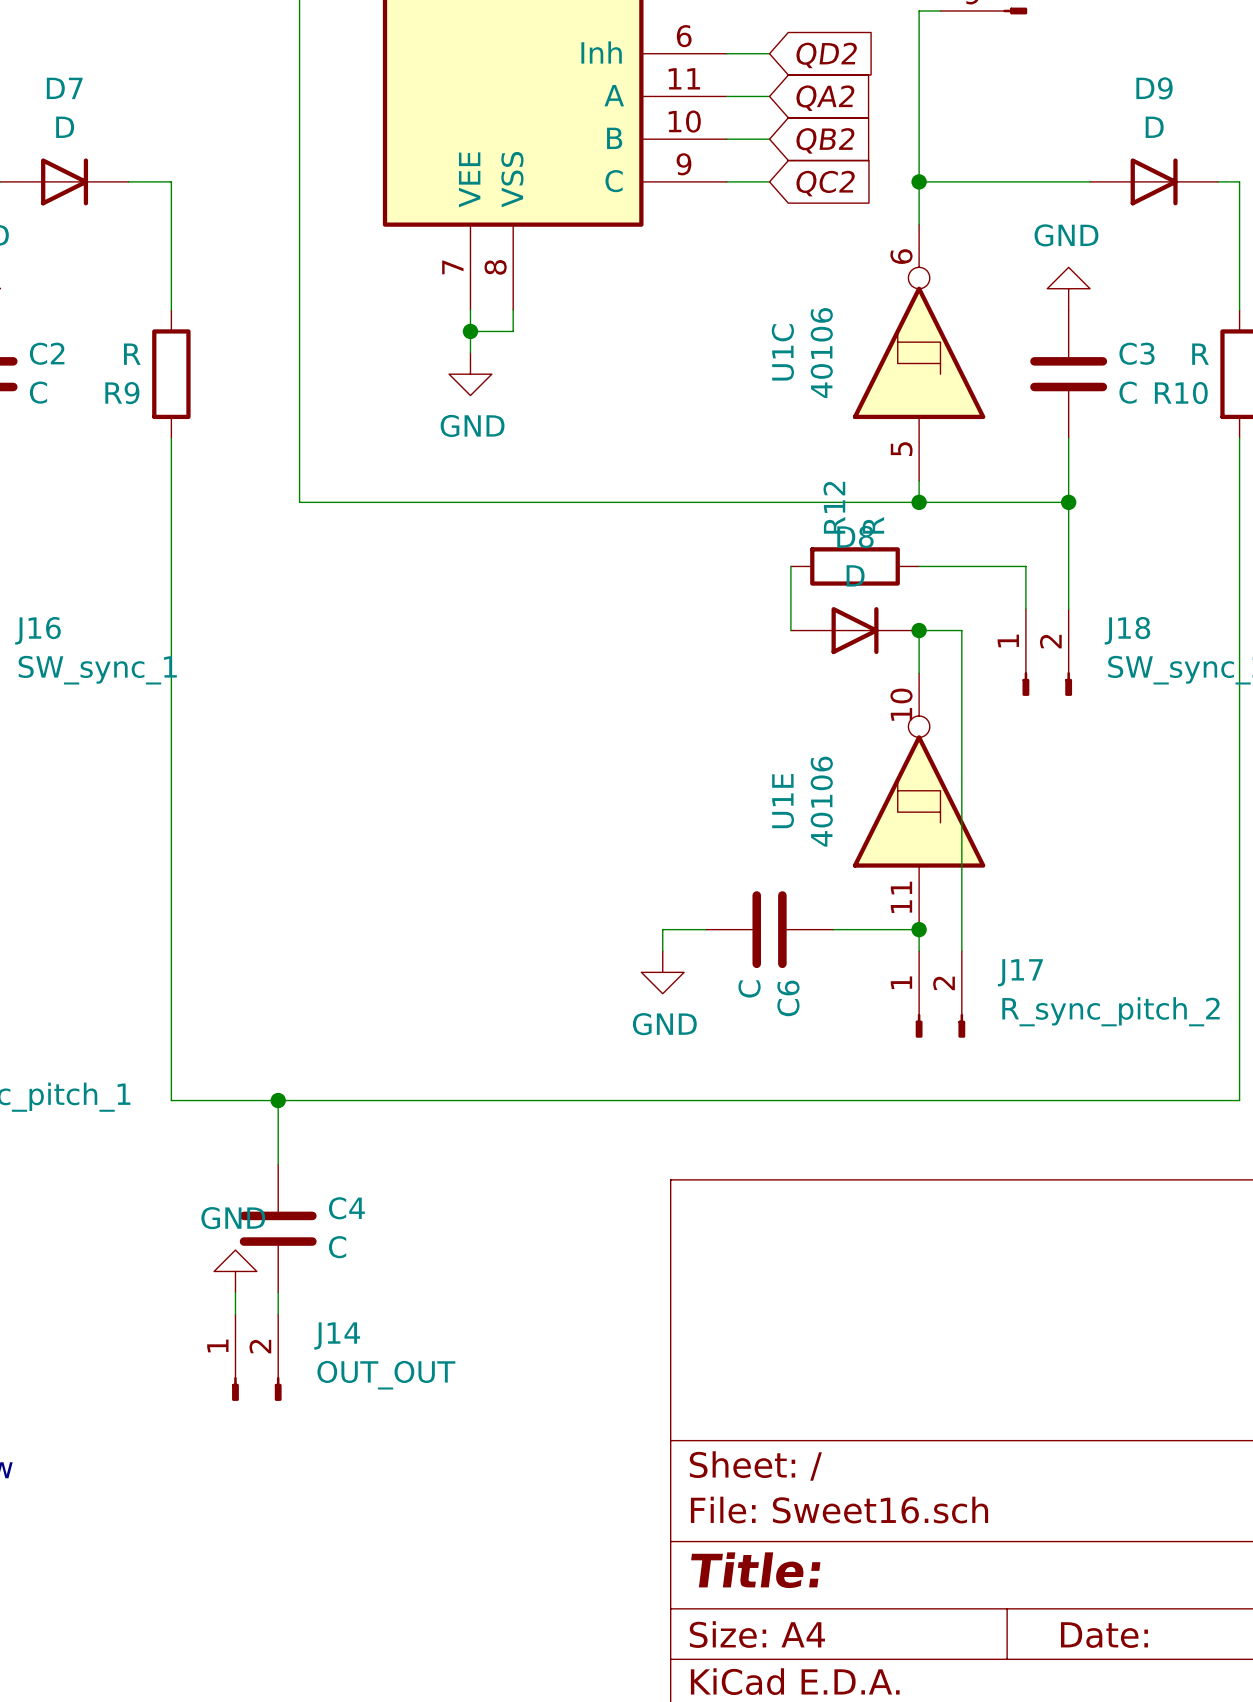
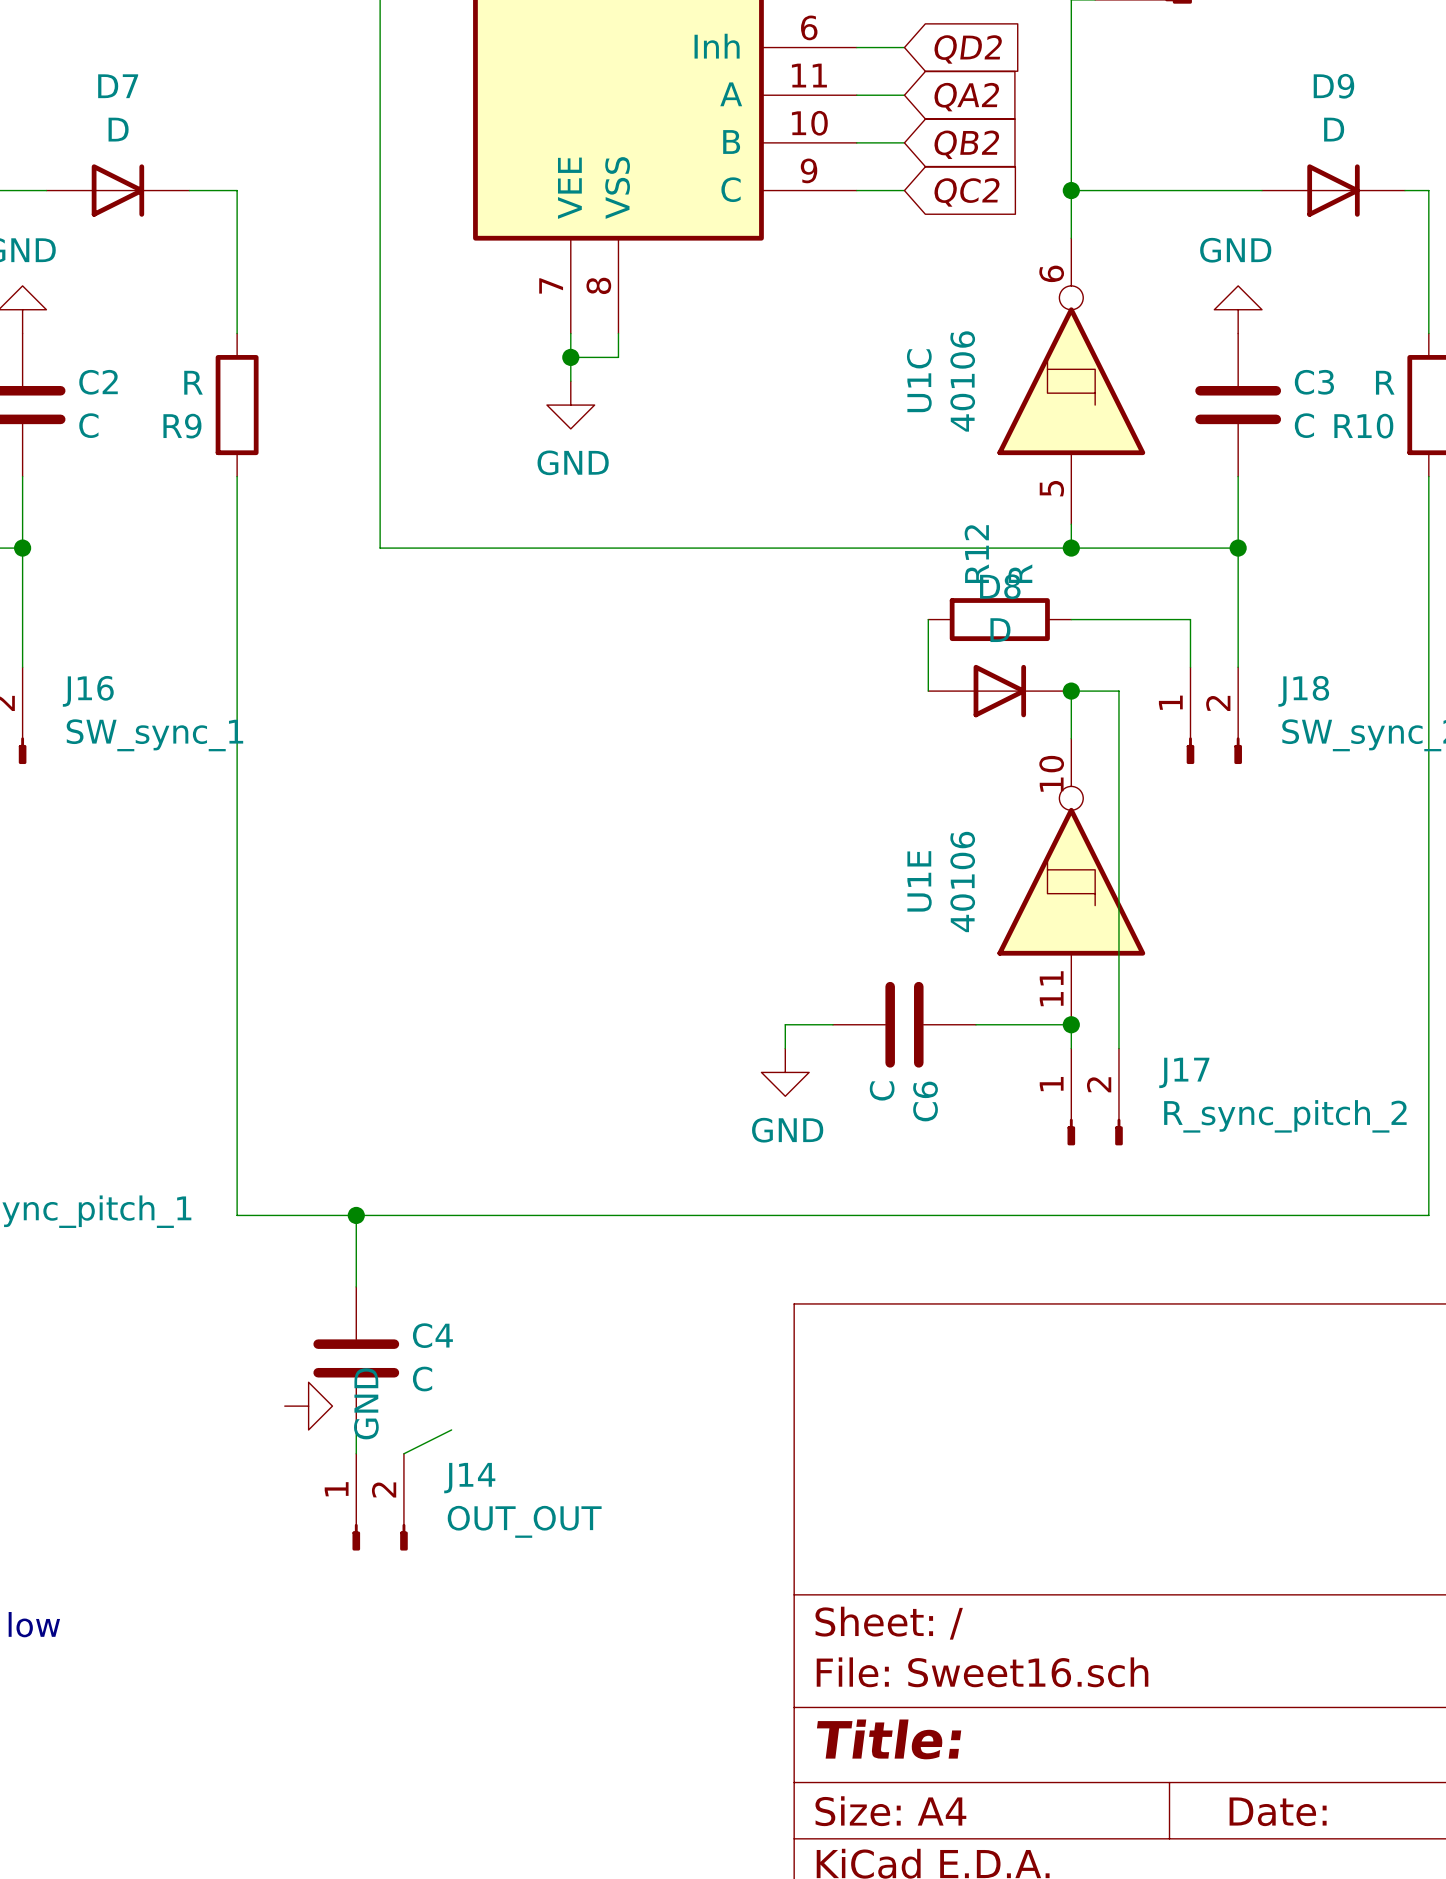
power symbol rotation: 0° (235, 1271) -> 90° clockwise (308, 1406)
wire: (235, 1292) (235, 1314) -> none
wire: none -> (451, 1429) (403, 1453)
J14 position: (256, 1357) -> (380, 1502)

